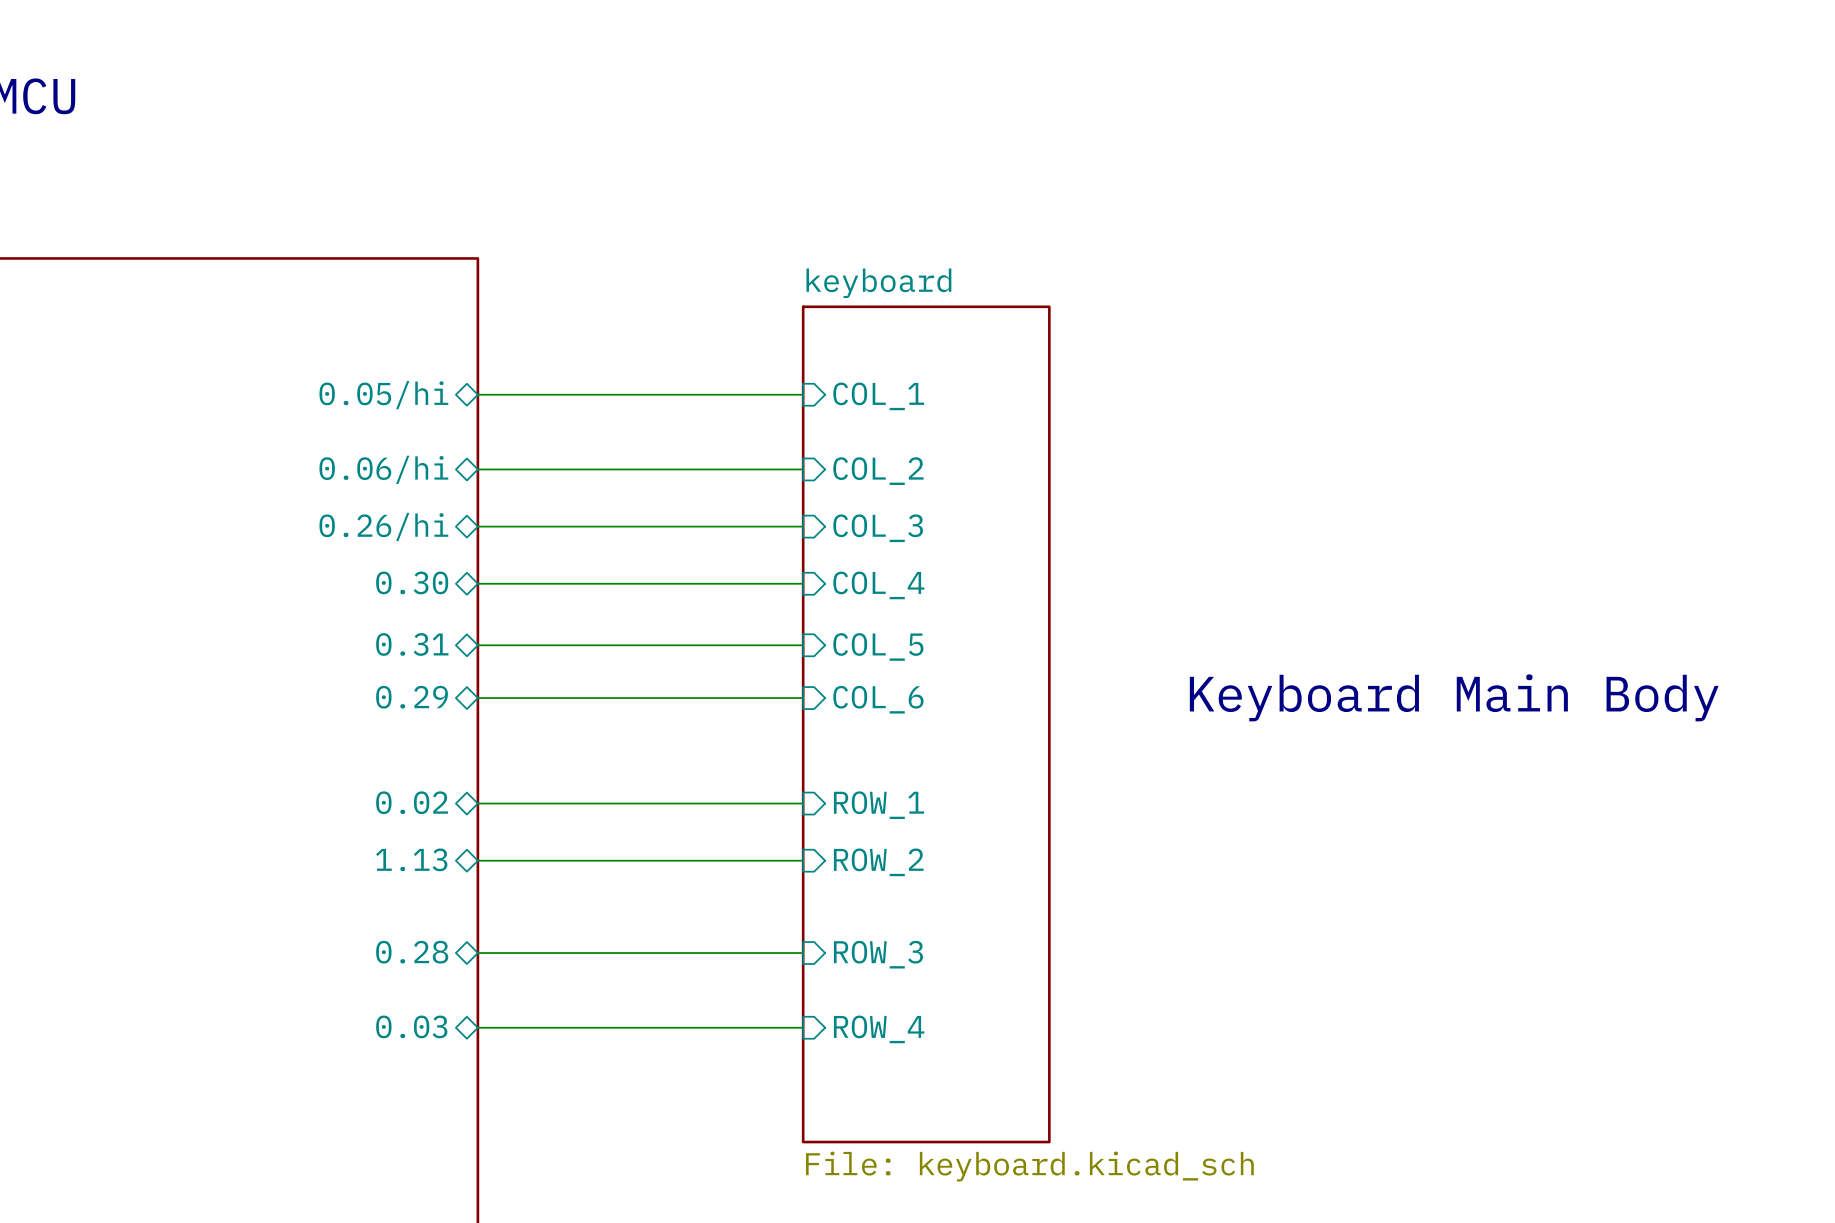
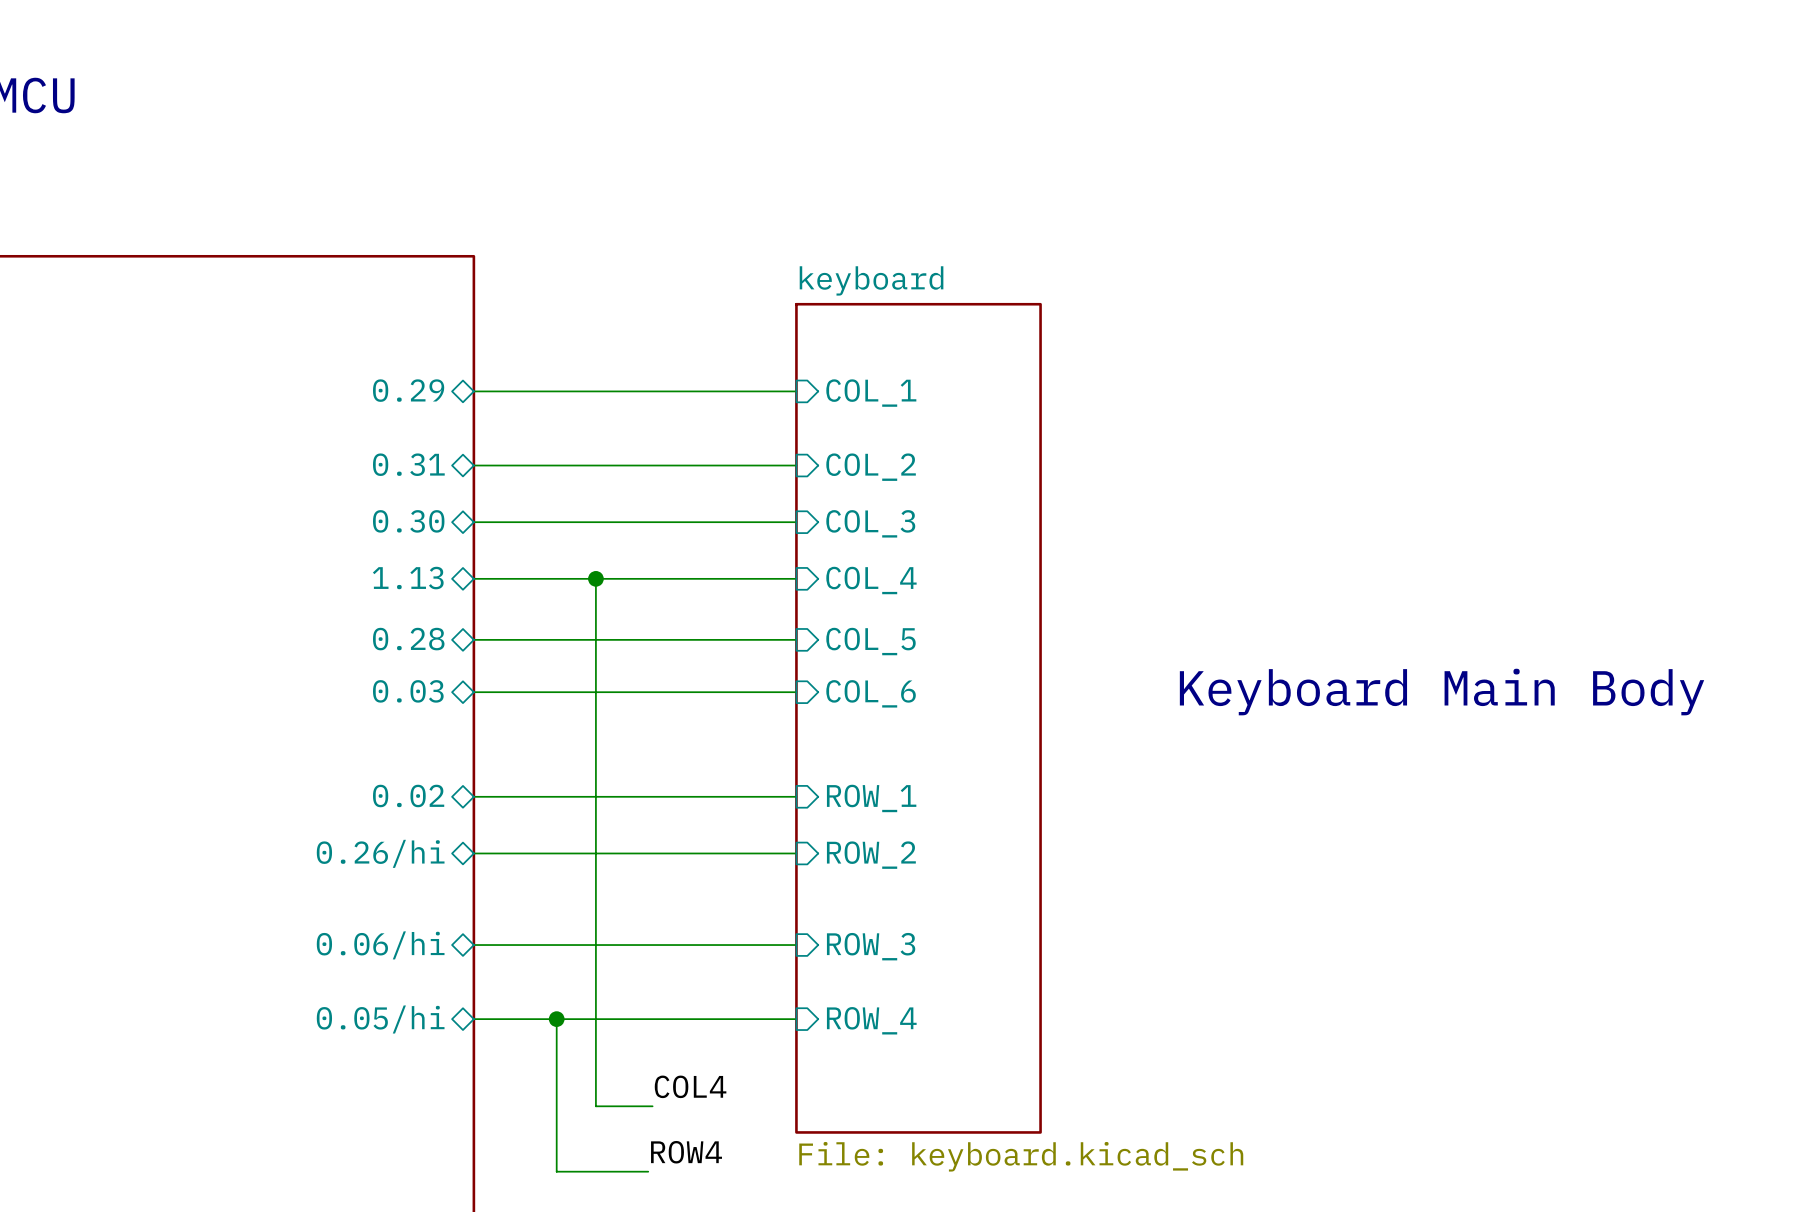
sheet pin: 0.05/hi (383, 395) -> 0.29 (408, 390)
sheet pin: 0.06/hi (383, 469) -> 0.31 (408, 464)
sheet pin: 0.26/hi (383, 526) -> 0.30 (408, 521)
sheet pin: 0.30 (412, 582) -> 1.13 (408, 578)
wire: none -> (595, 578) (595, 1106) (652, 1106)
junction: none -> (595, 578)
sheet pin: 0.31 (412, 644) -> 0.28 (408, 639)
sheet pin: 0.29 (412, 697) -> 0.03 (408, 691)
sheet pin: 1.13 (411, 859) -> 0.26/hi (380, 853)
sheet pin: 0.28 (412, 952) -> 0.06/hi (380, 945)
sheet pin: 0.03 (411, 1026) -> 0.05/hi (380, 1019)
wire: none -> (556, 1019) (556, 1171) (648, 1171)
junction: none -> (556, 1019)
label: none -> COL4 (690, 1086)
label: none -> ROW4 (686, 1152)

